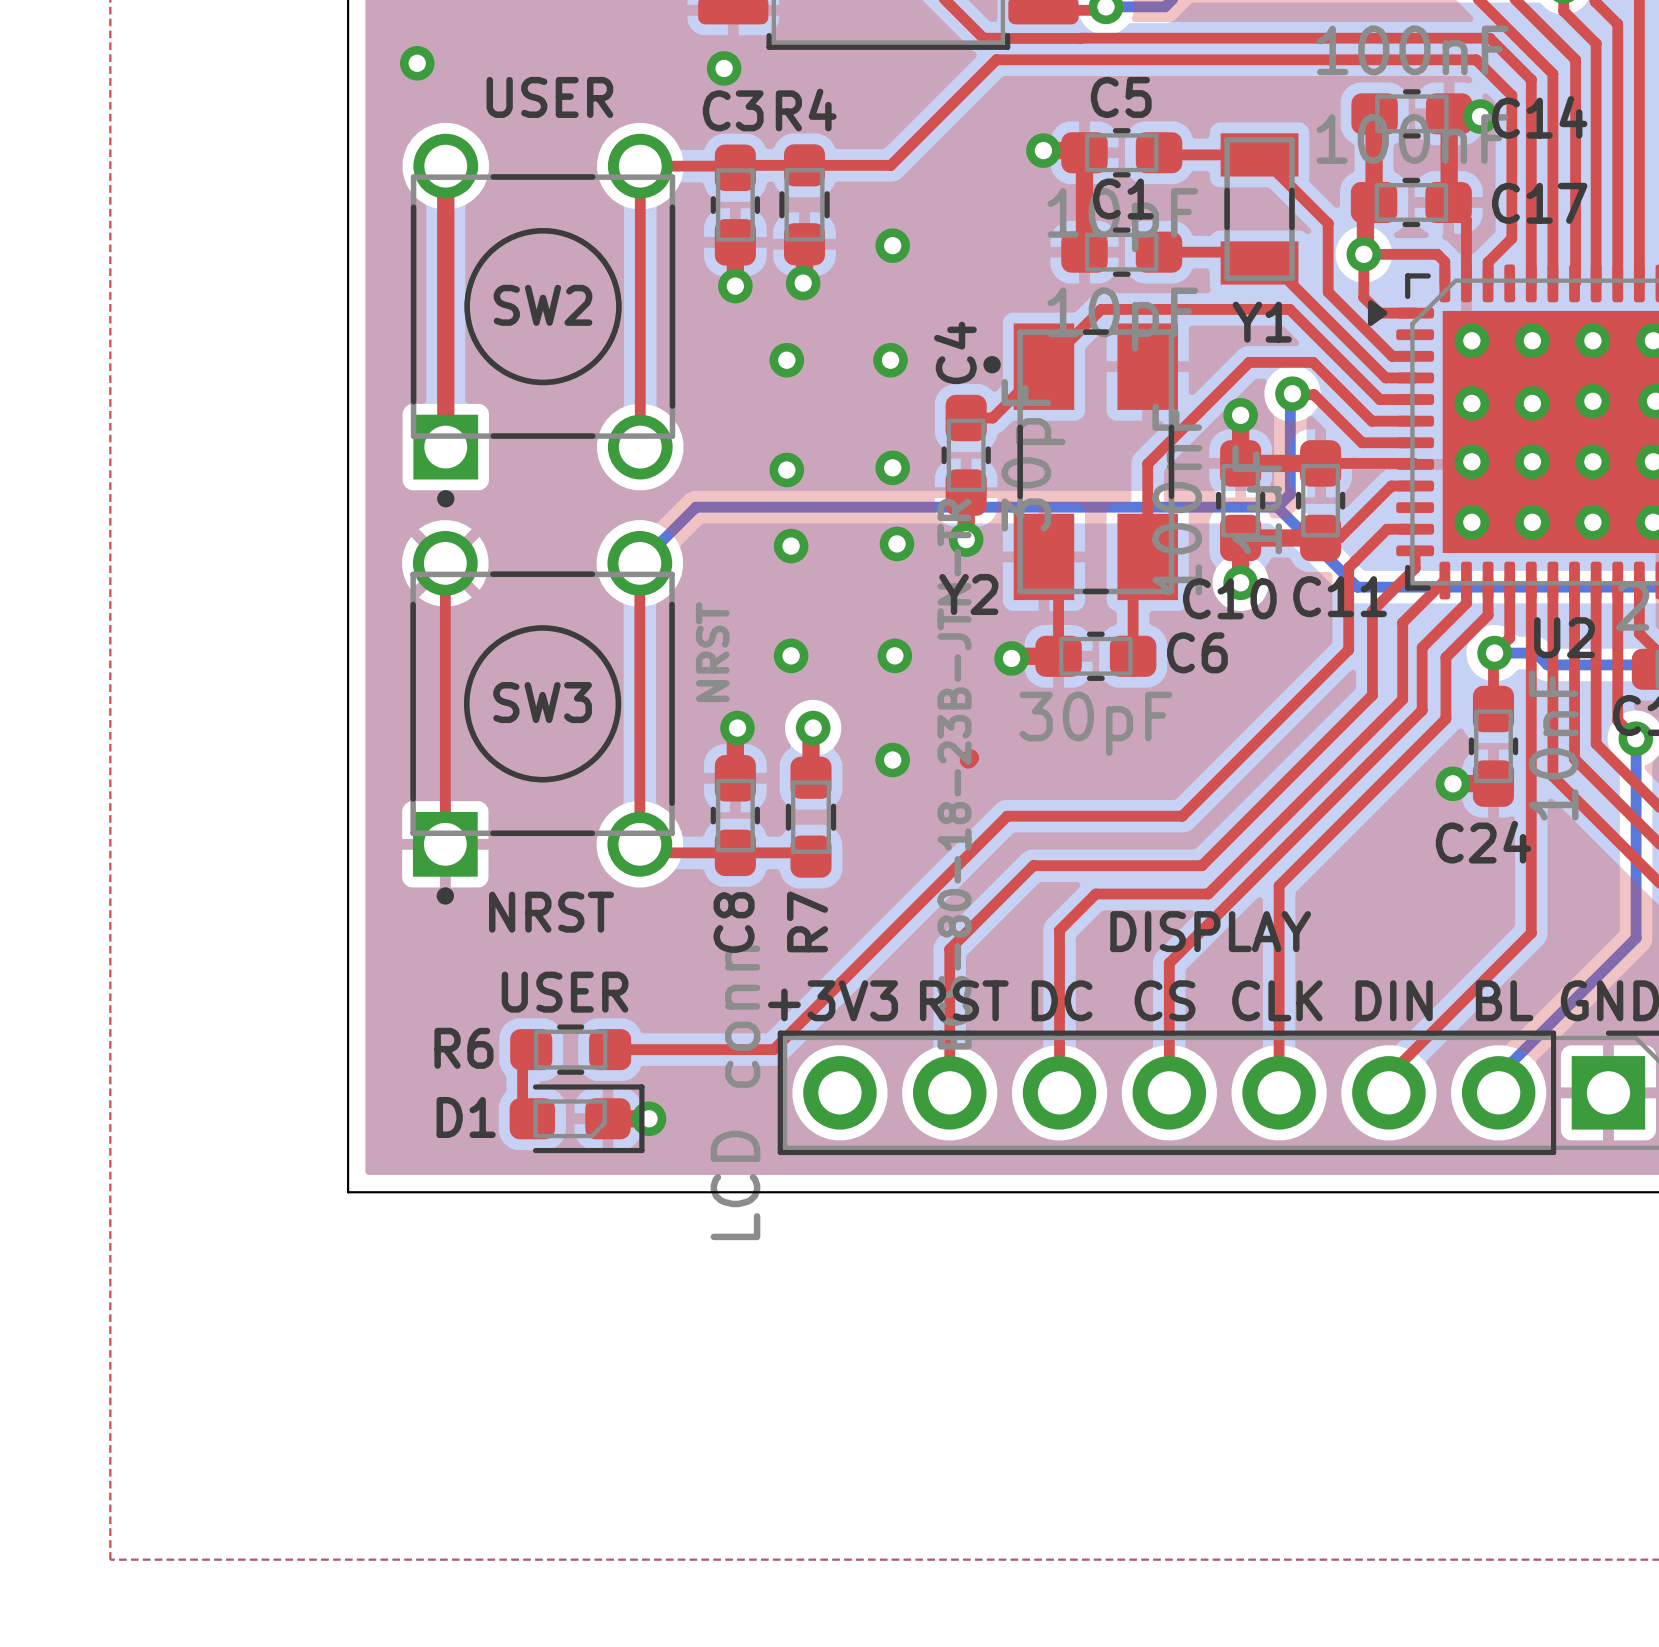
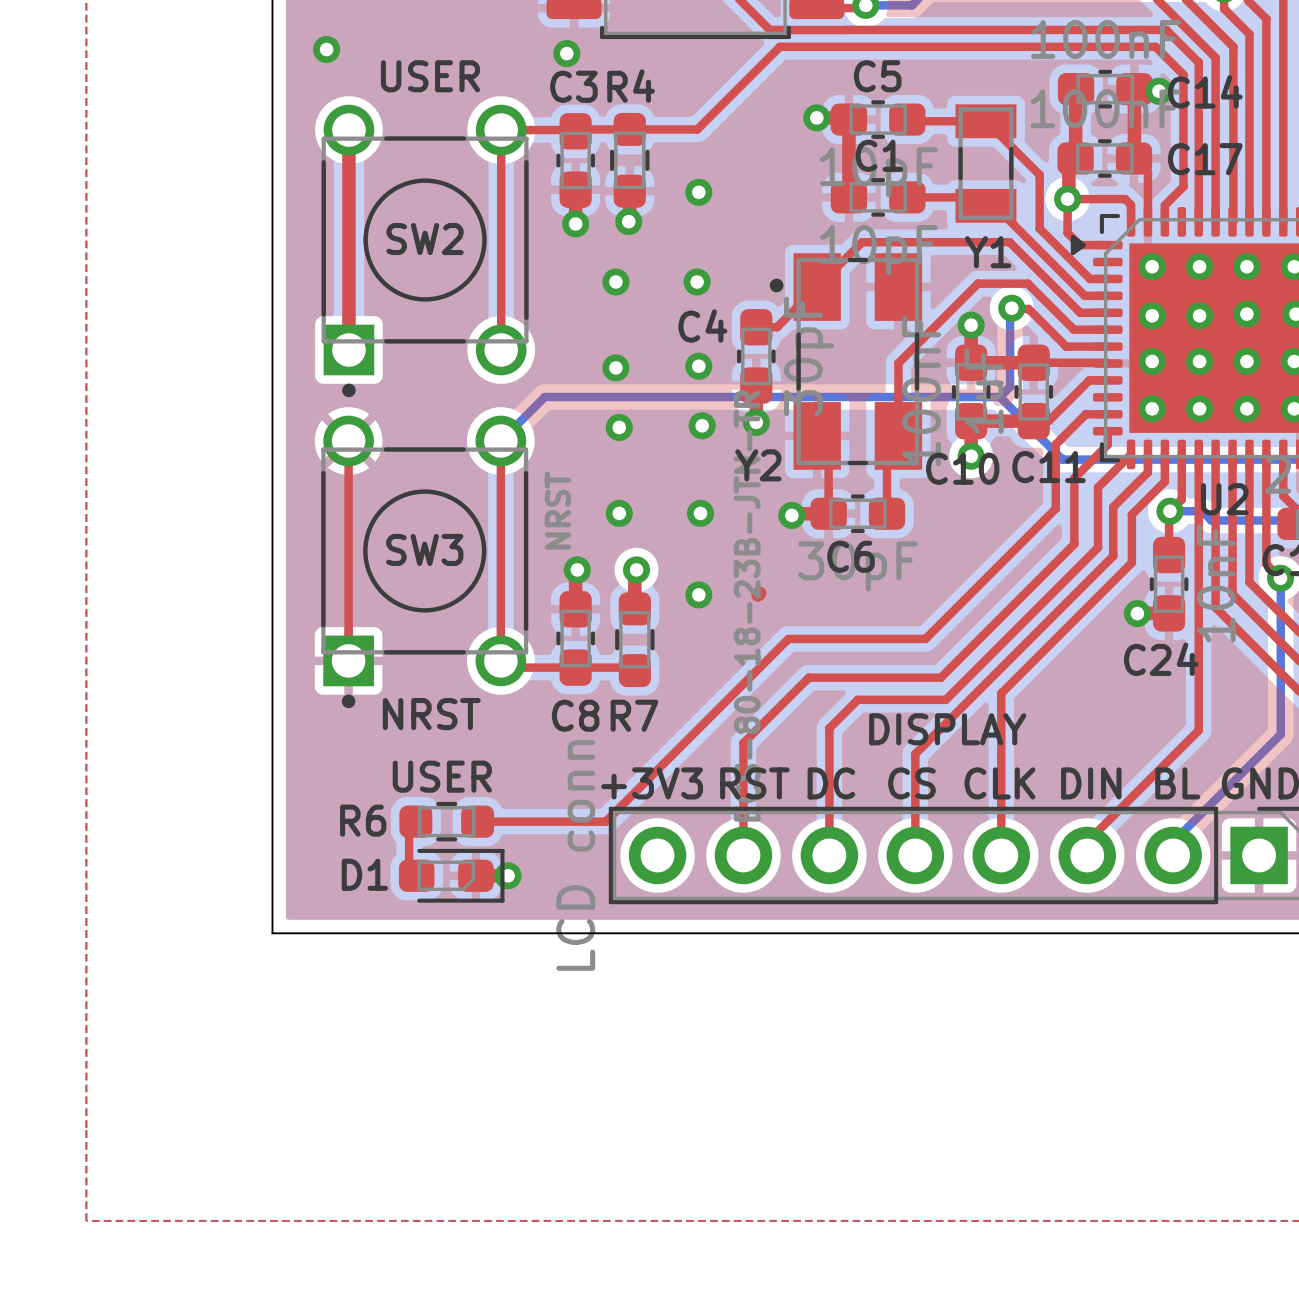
C4 name rotation: 0° (955, 352) -> 90° clockwise (702, 326)
C4 name position: C4 (955, 352) -> C4 (702, 326)
C6 name position: C6 (1197, 652) -> C6 (851, 556)
R7 name rotation: 0° (807, 921) -> 90° clockwise (634, 715)
C8 name rotation: 0° (734, 922) -> 90° clockwise (575, 715)

